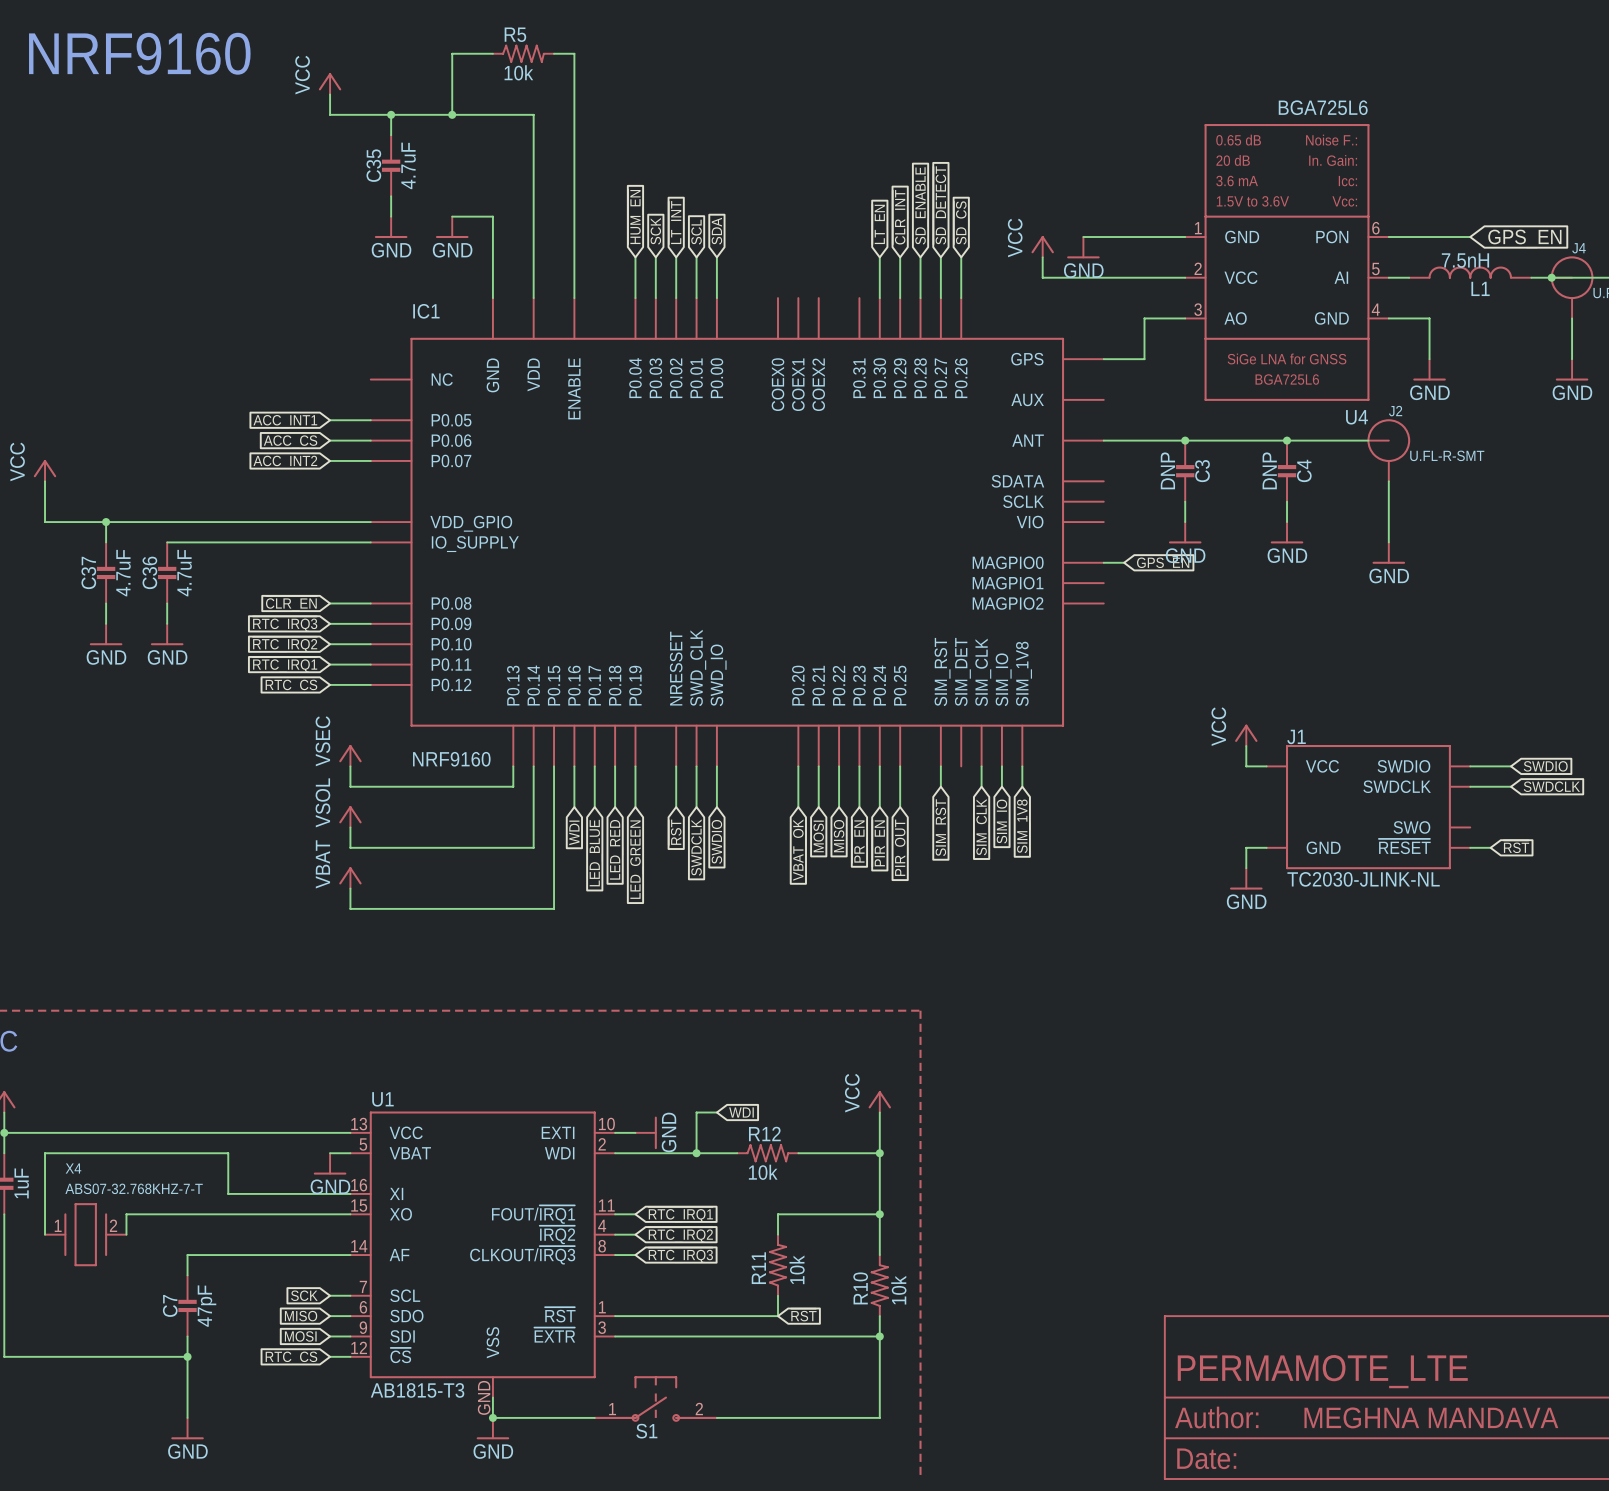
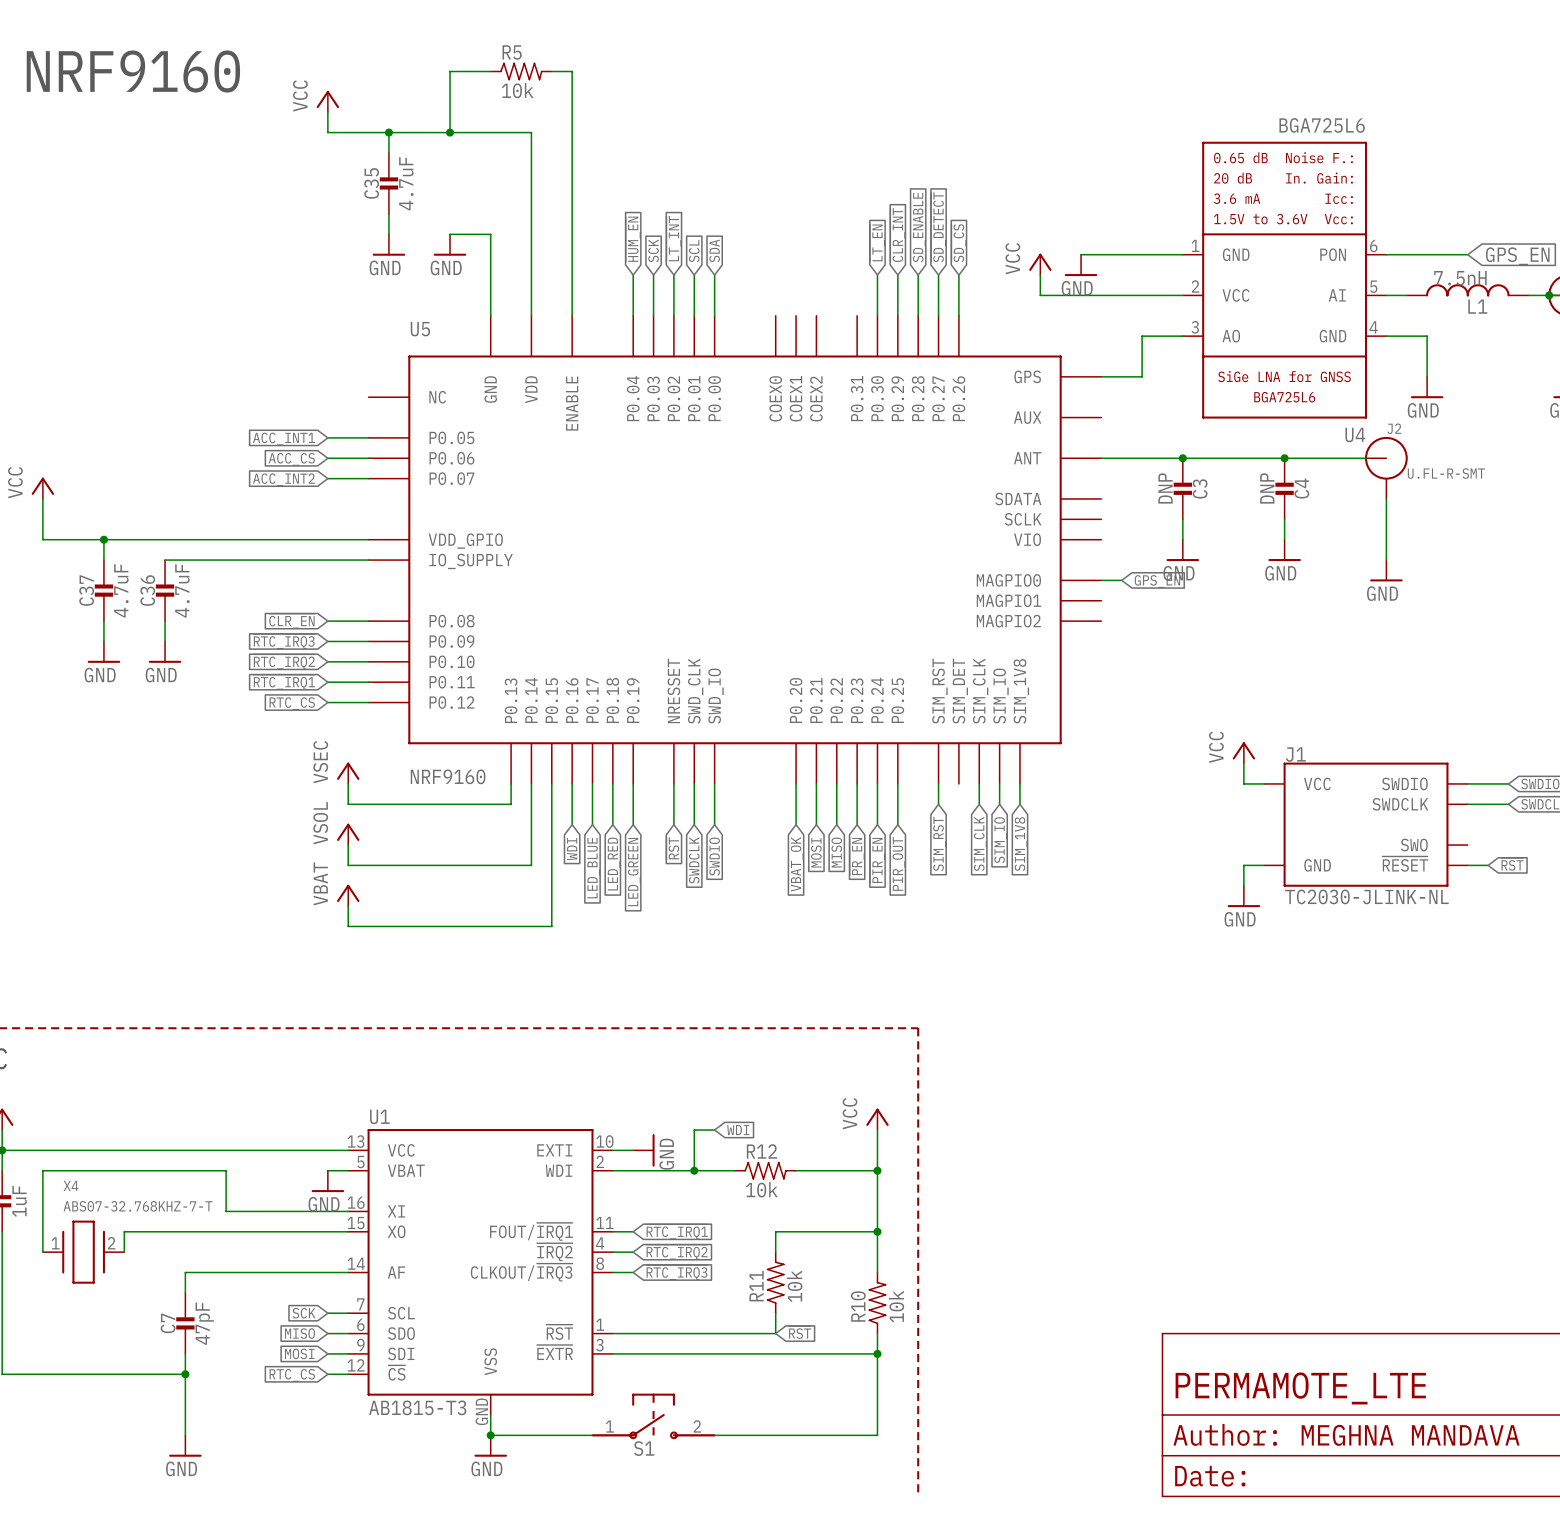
IC1 name: IC1 (426, 311) -> U5 (420, 329)

